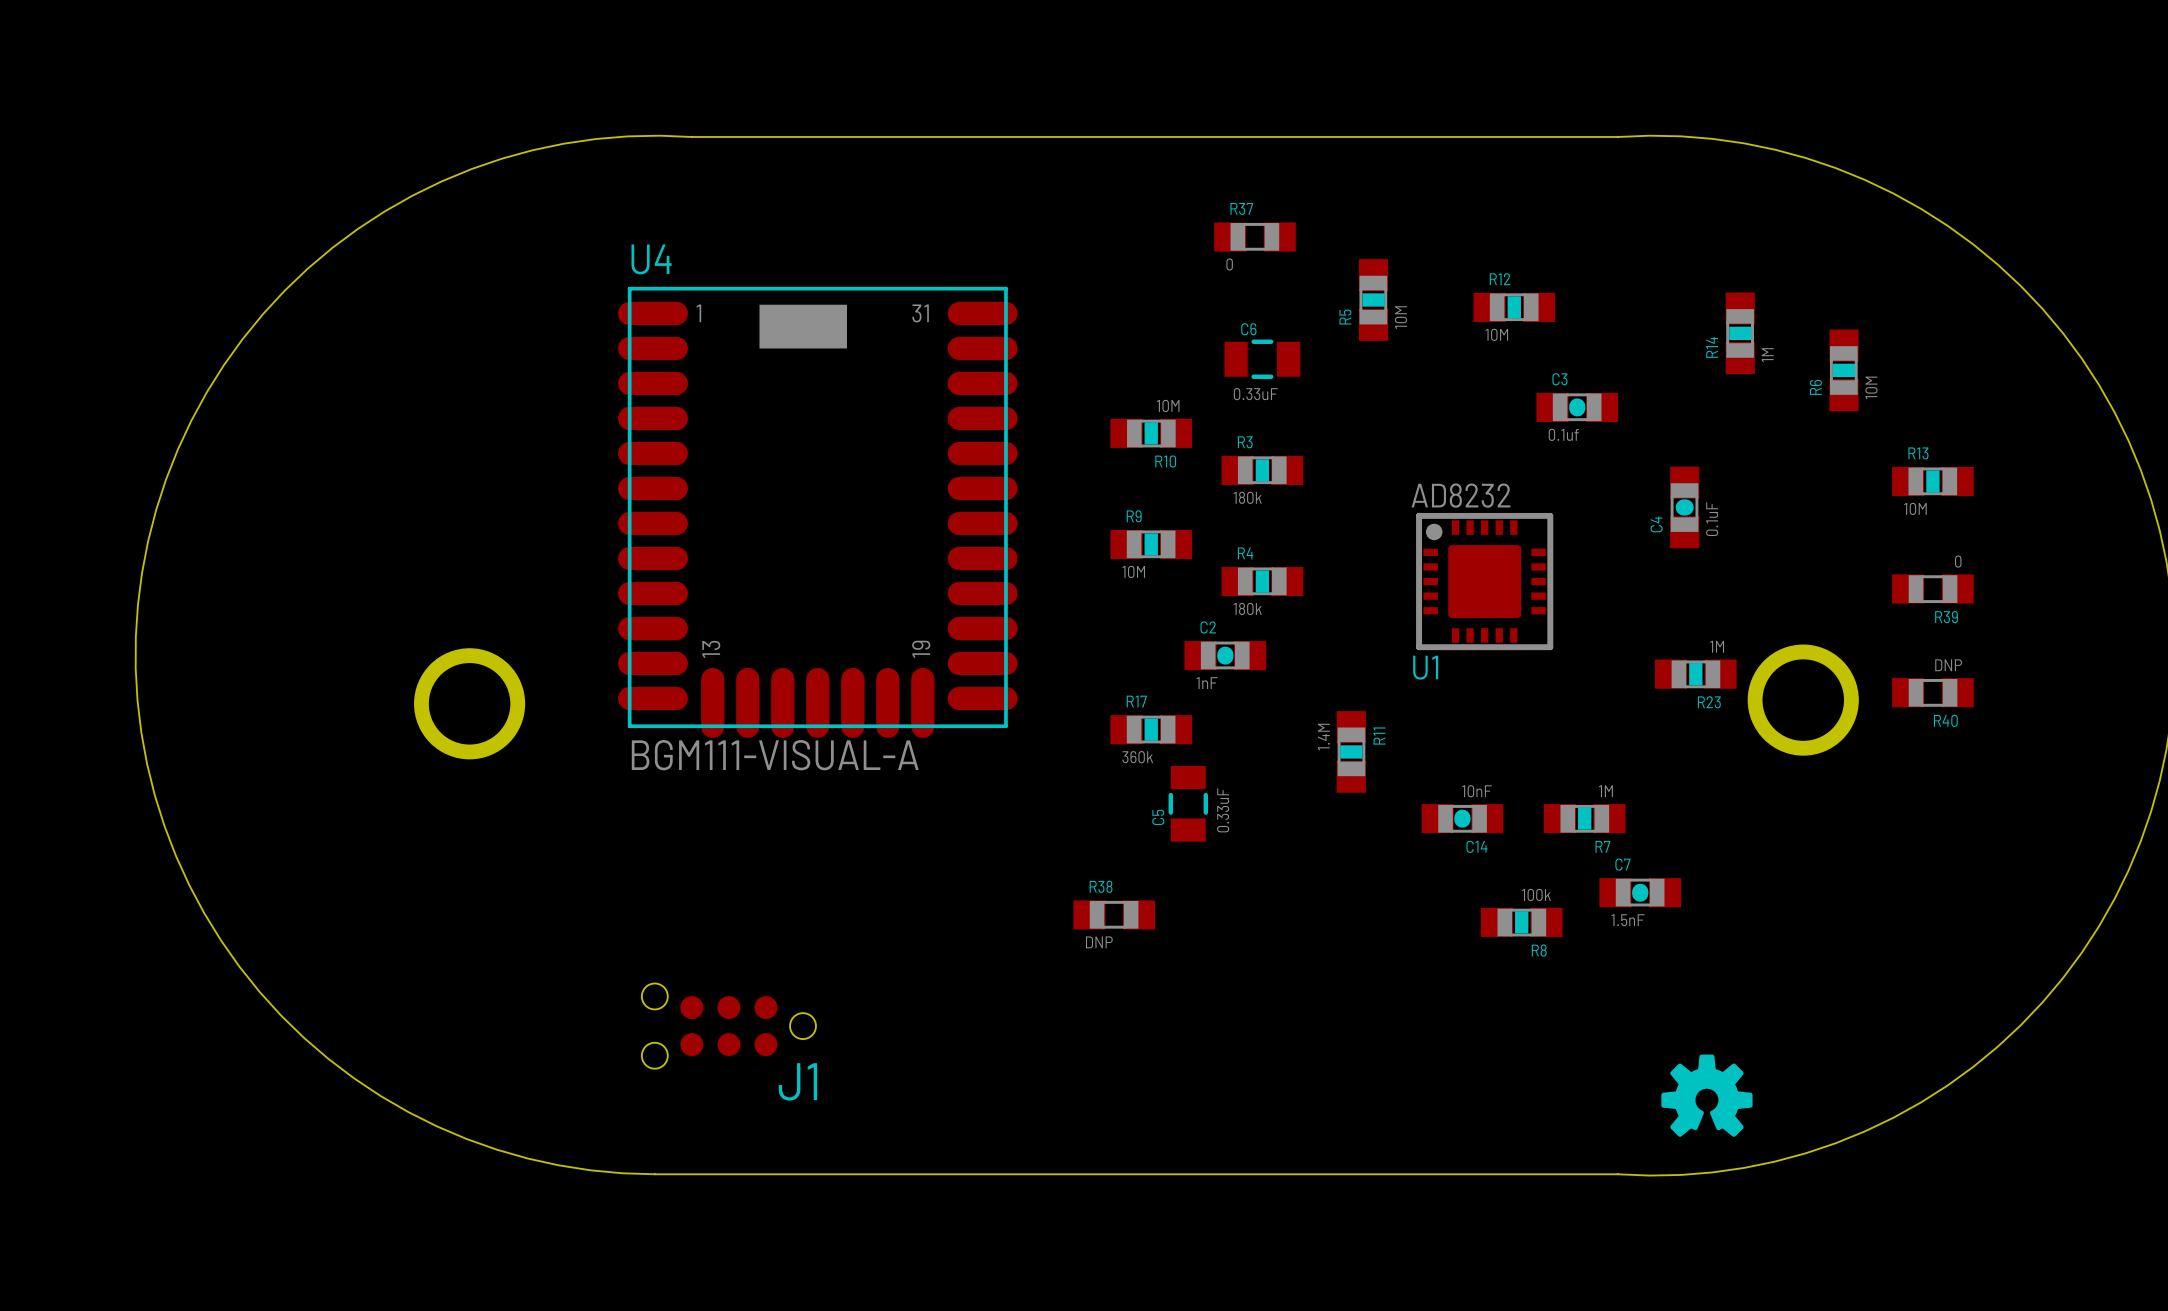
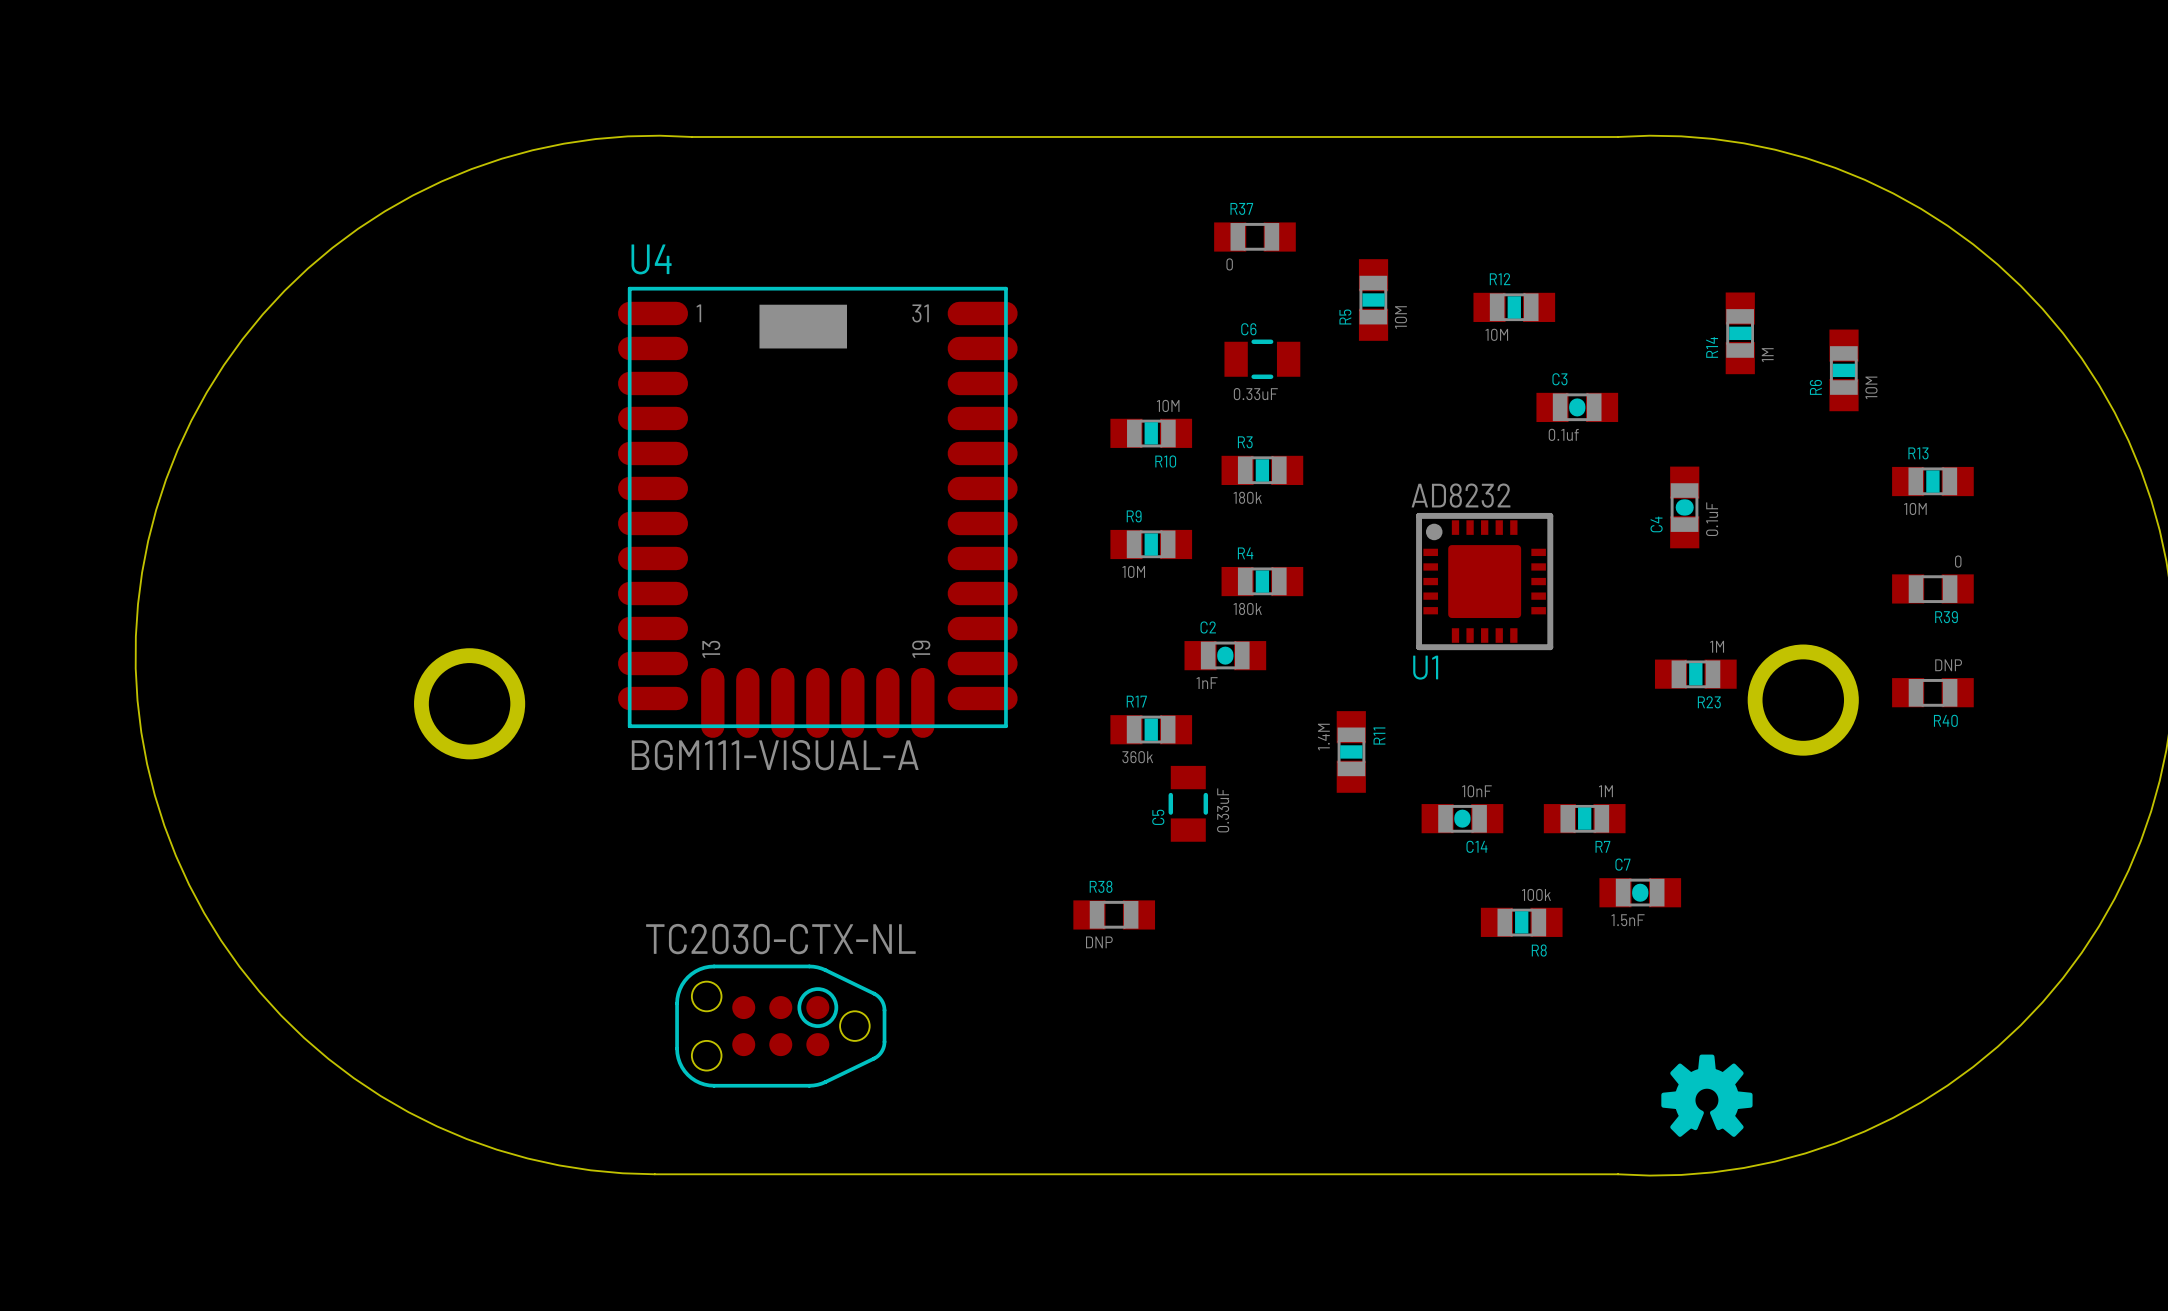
J1: (728, 1026) -> none
part: none -> TC2030-CTX-NL (780, 1026)

